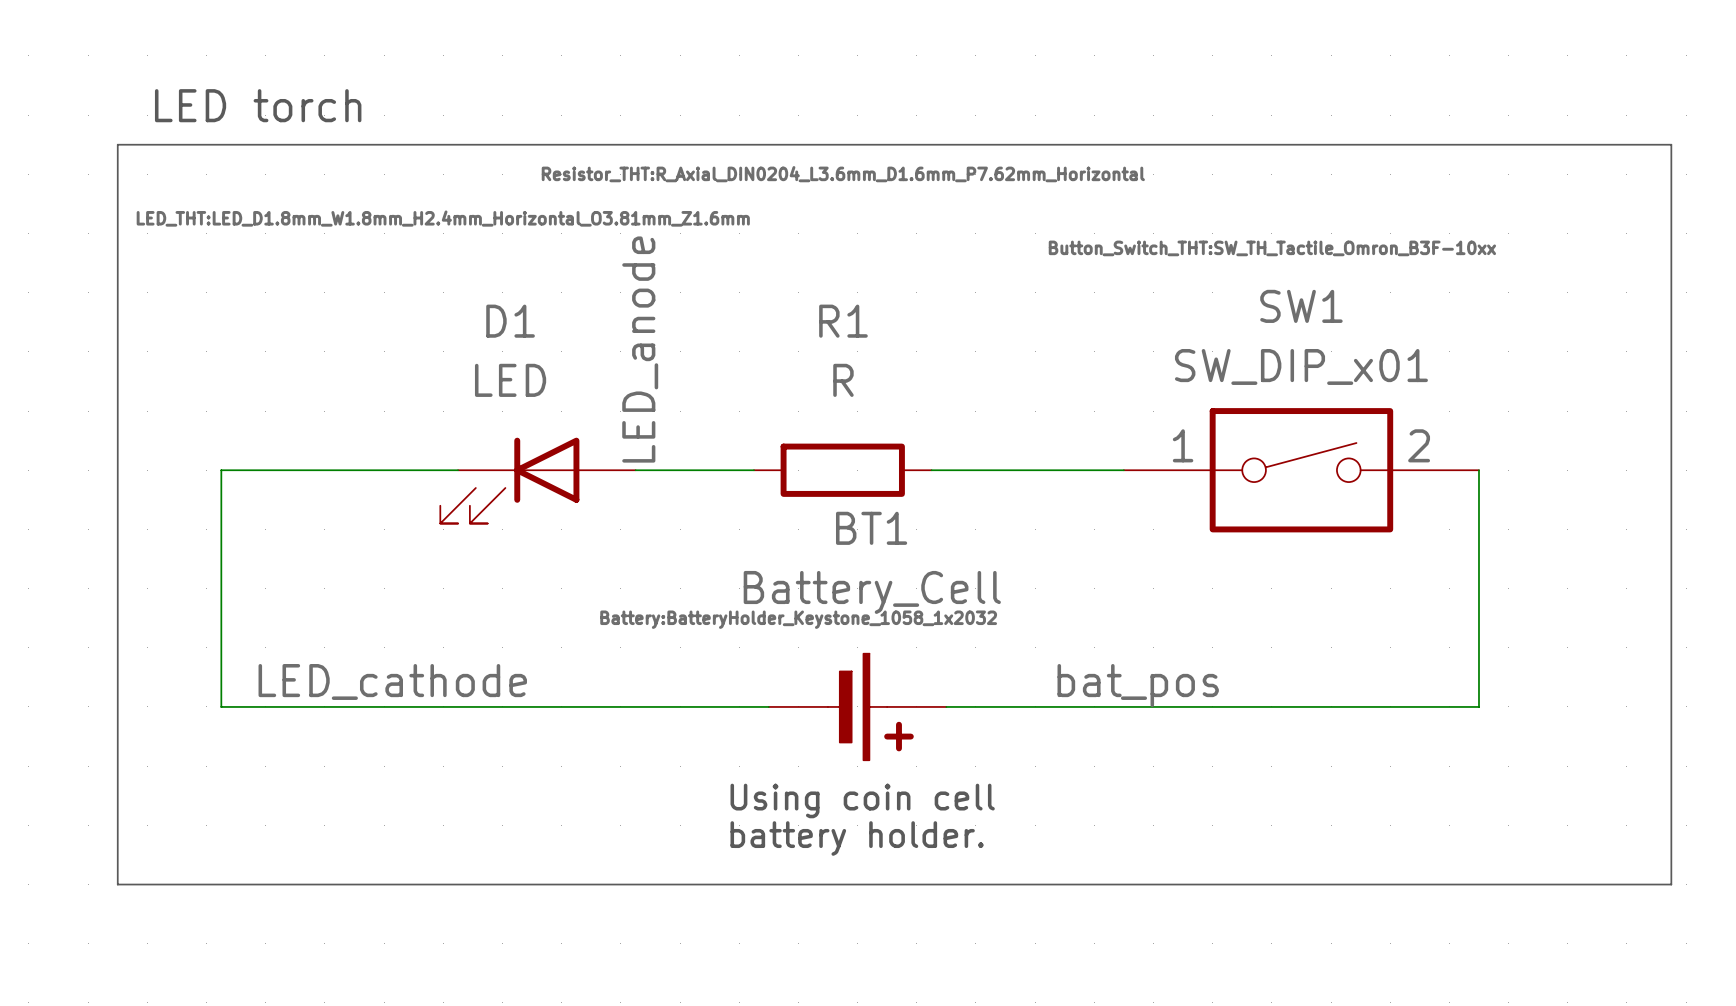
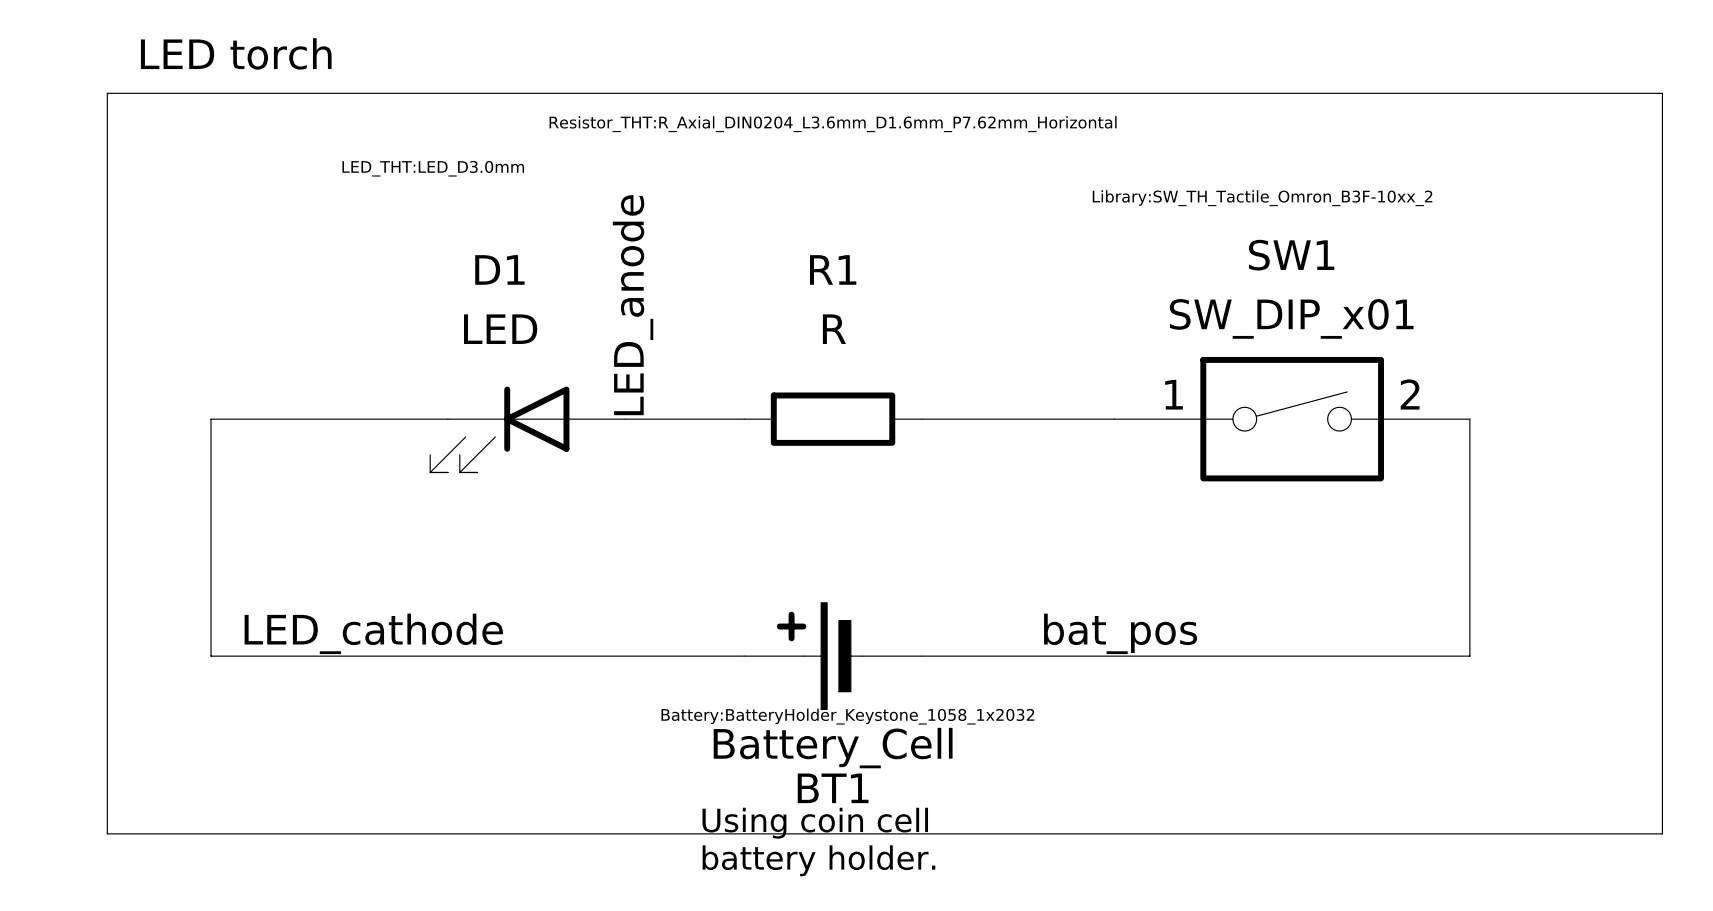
D1 text: LED_THT:LED_D1.8mm_W1.8mm_H2.4mm_Horizontal_O3.81mm_Z1.6mm (443, 218) -> LED_THT:LED_D3.0mm (433, 168)
SW1 text: Button_Switch_THT:SW_TH_Tactile_Omron_B3F-10xx (1272, 248) -> Library:SW_TH_Tactile_Omron_B3F-10xx_2 (1262, 198)
BT1 text position: Battery:BatteryHolder_Keystone_1058_1x2032 (798, 619) -> Battery:BatteryHolder_Keystone_1058_1x2032 (847, 716)
BT1 rotation: 0° (870, 706) -> 180° (819, 656)
text position: Using coin cell (862, 800) -> Using coin cell (815, 823)
text position: battery holder. (857, 838) -> battery holder. (818, 860)

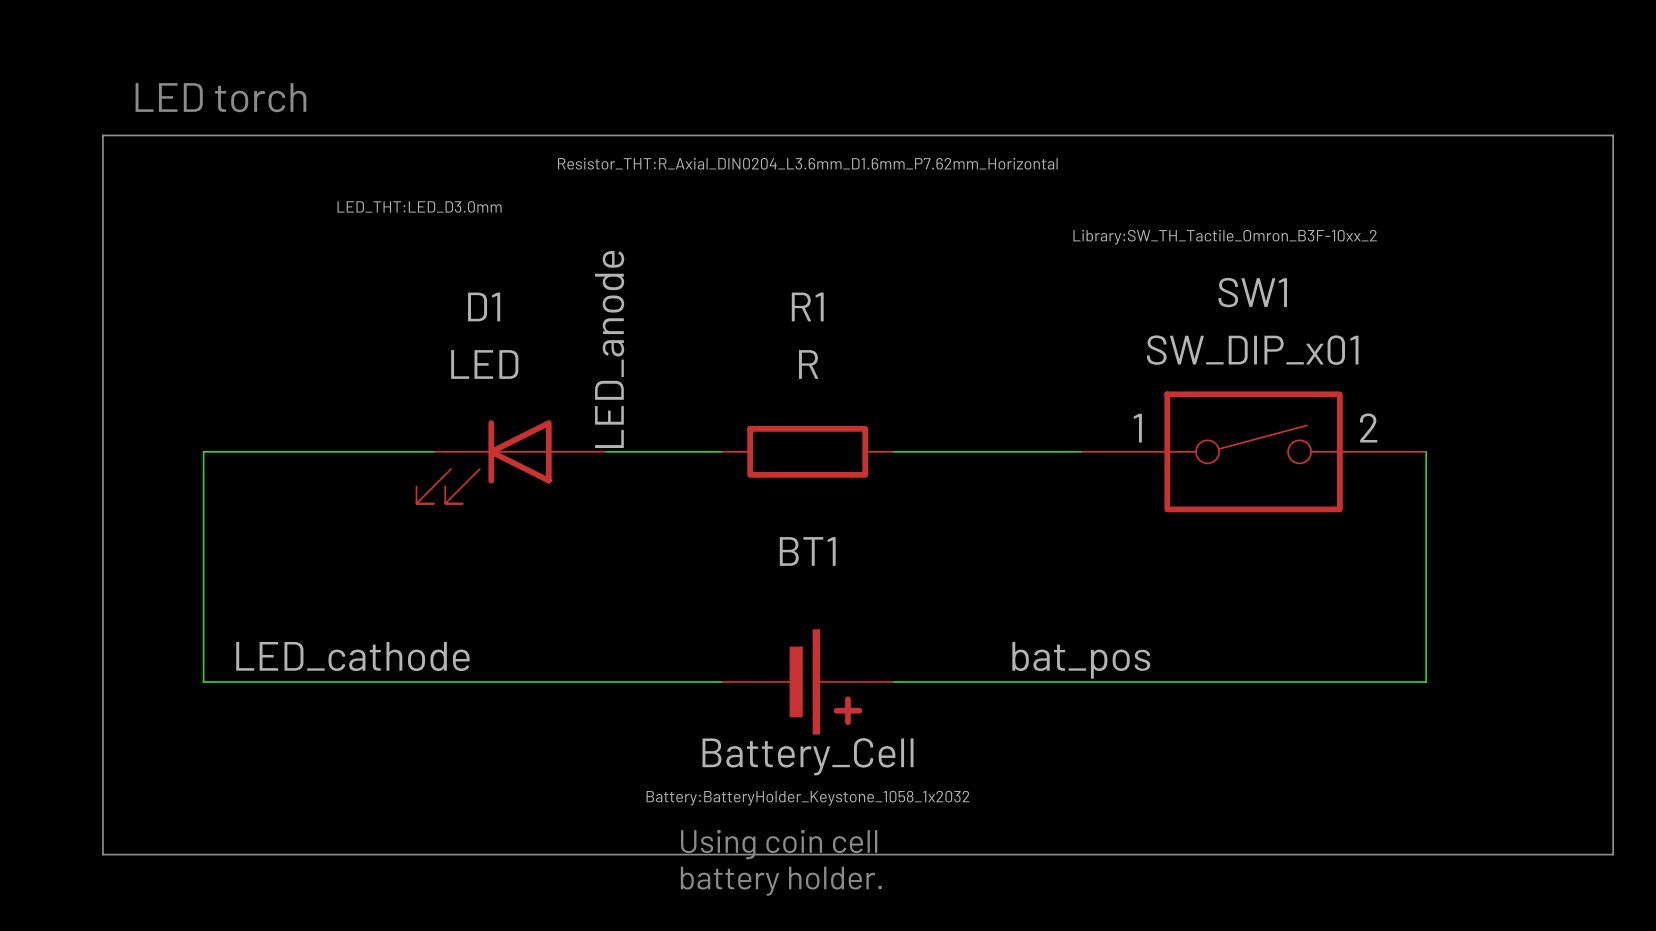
BT1 rotation: 0° (819, 656) -> 180° (820, 681)
BT1 text position: Battery:BatteryHolder_Keystone_1058_1x2032 (847, 716) -> Battery:BatteryHolder_Keystone_1058_1x2032 (808, 798)

